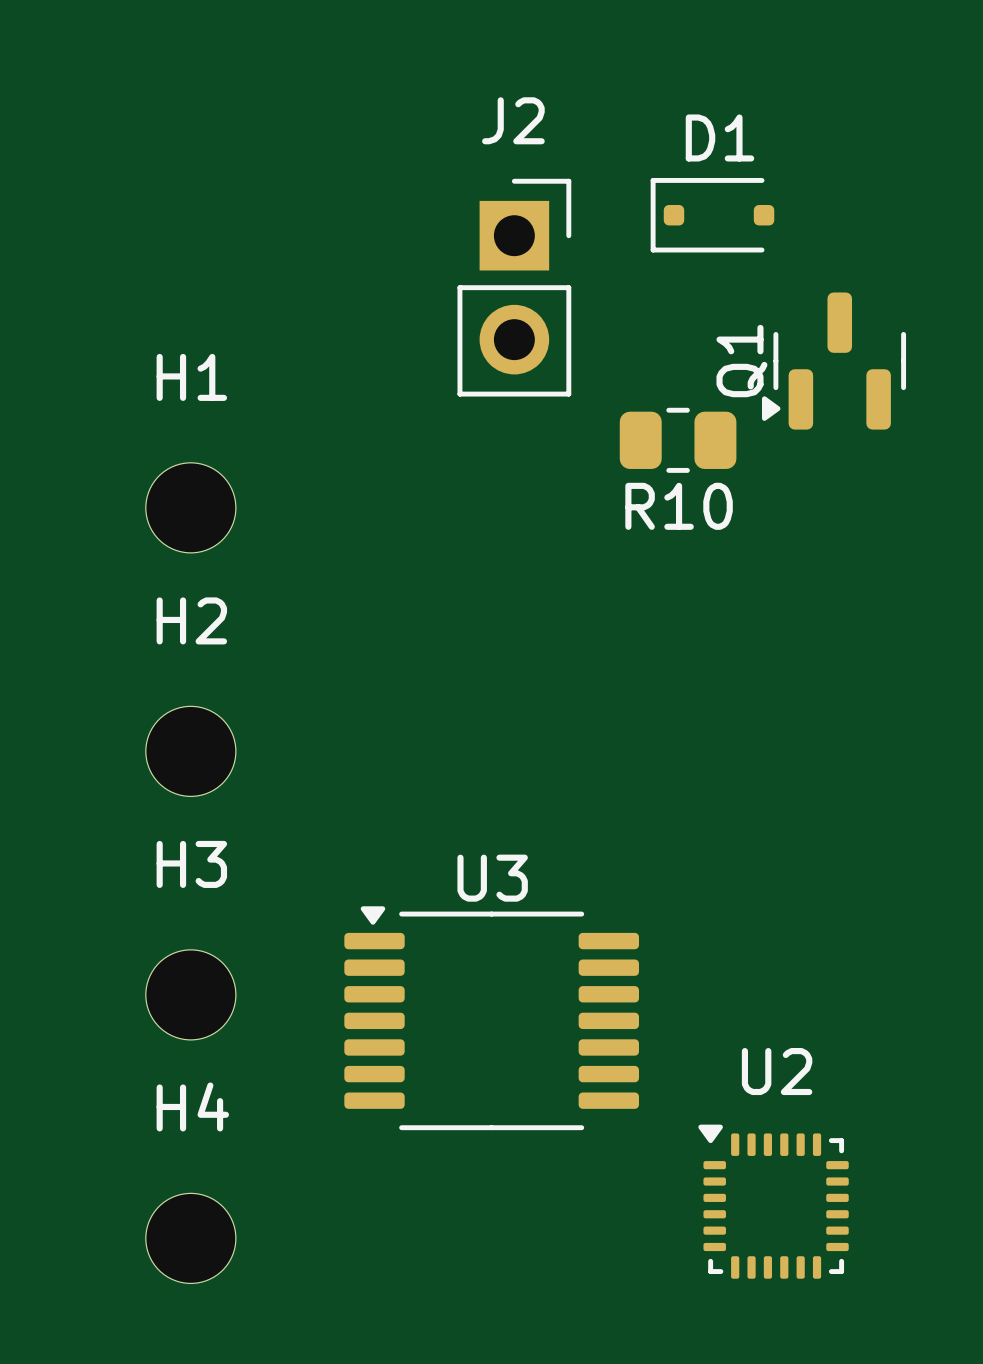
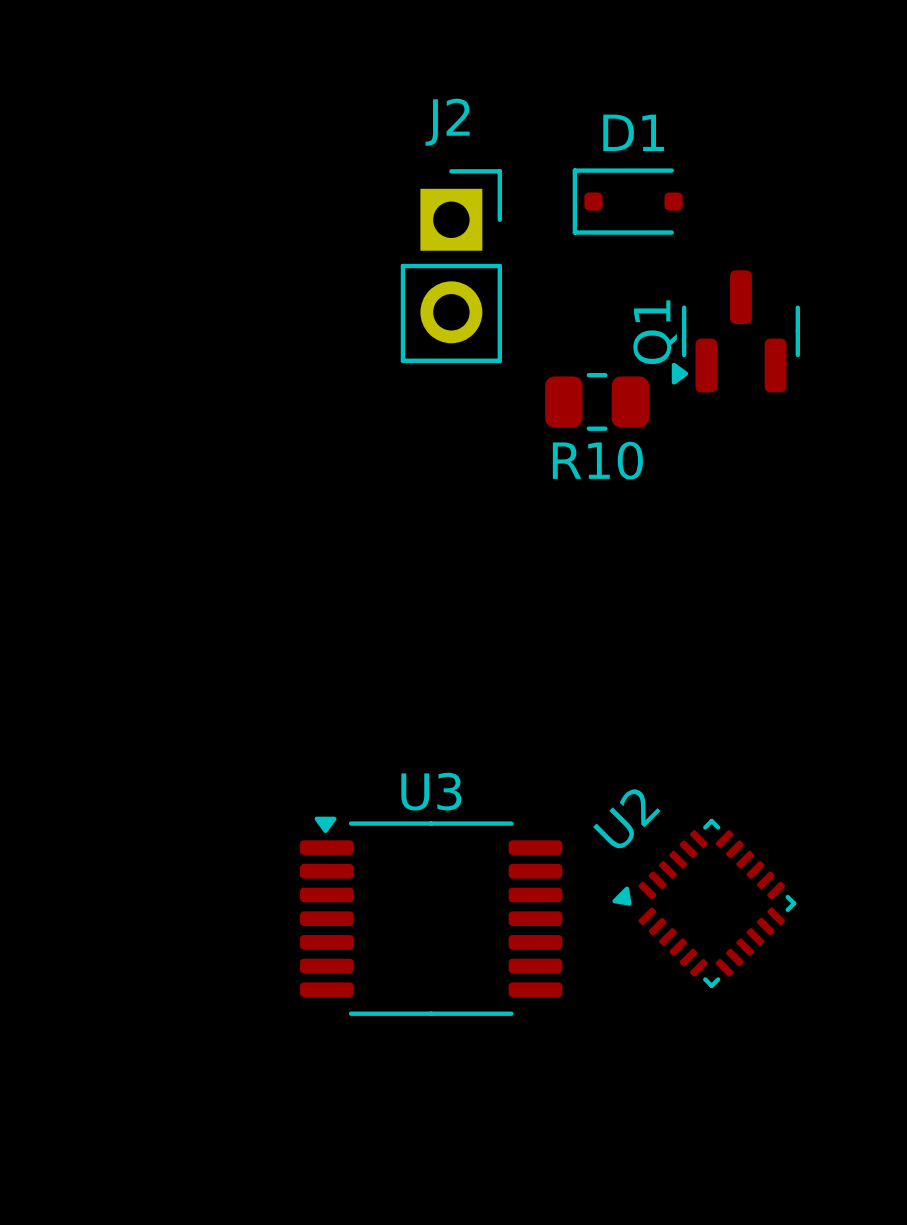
H1: (190, 507) -> none
H2: (190, 751) -> none
H3: (190, 994) -> none
U2 rotation: 0° (773, 1201) -> 45° counterclockwise (704, 903)
U2 position: (773, 1201) -> (704, 903)
H4: (190, 1238) -> none

